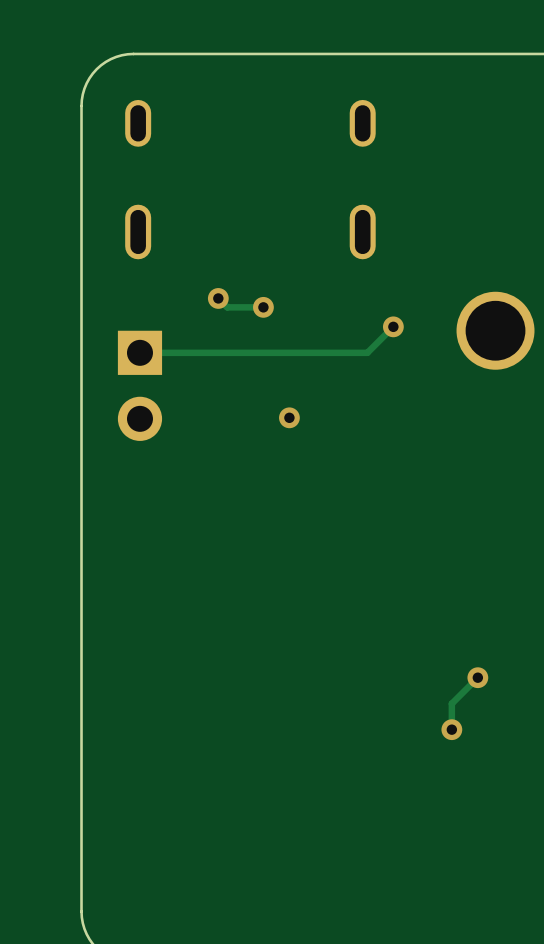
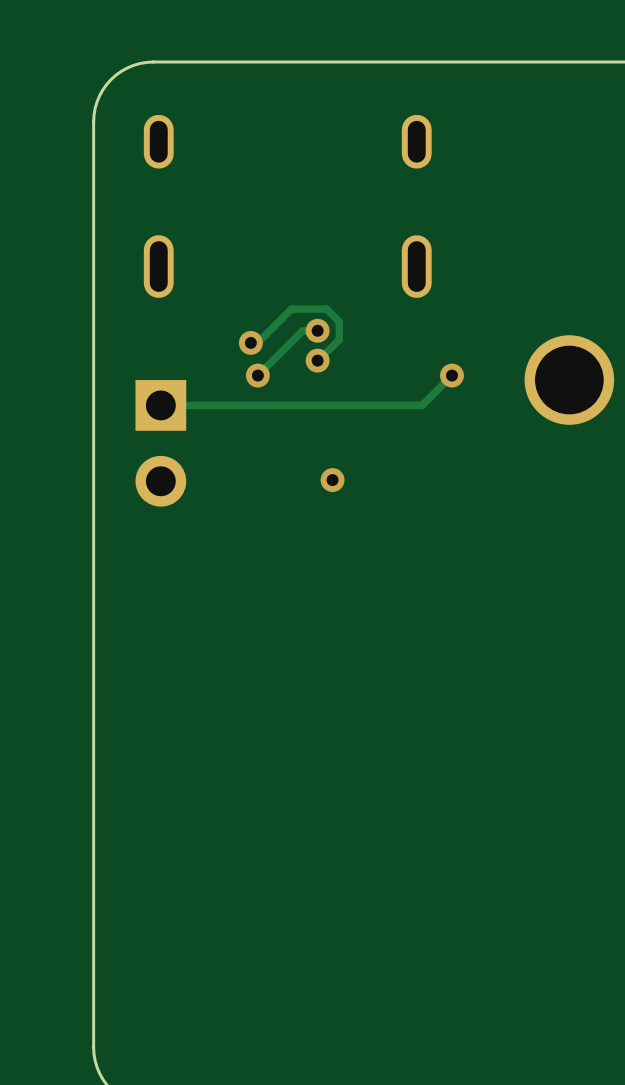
track: none -> (317, 330) (302, 330) (257, 375)
via: none -> (317, 330)
track: (218, 298) (227, 307) (263, 307) -> none
track: none -> (256, 343) (291, 309) (326, 309) (339, 321) (339, 339) (317, 360)
via: (263, 307) -> none
via: none -> (317, 360)
via: none -> (257, 375)
track: (477, 677) (451, 703) (451, 729) -> none
via: (477, 677) -> none
via: (451, 729) -> none

